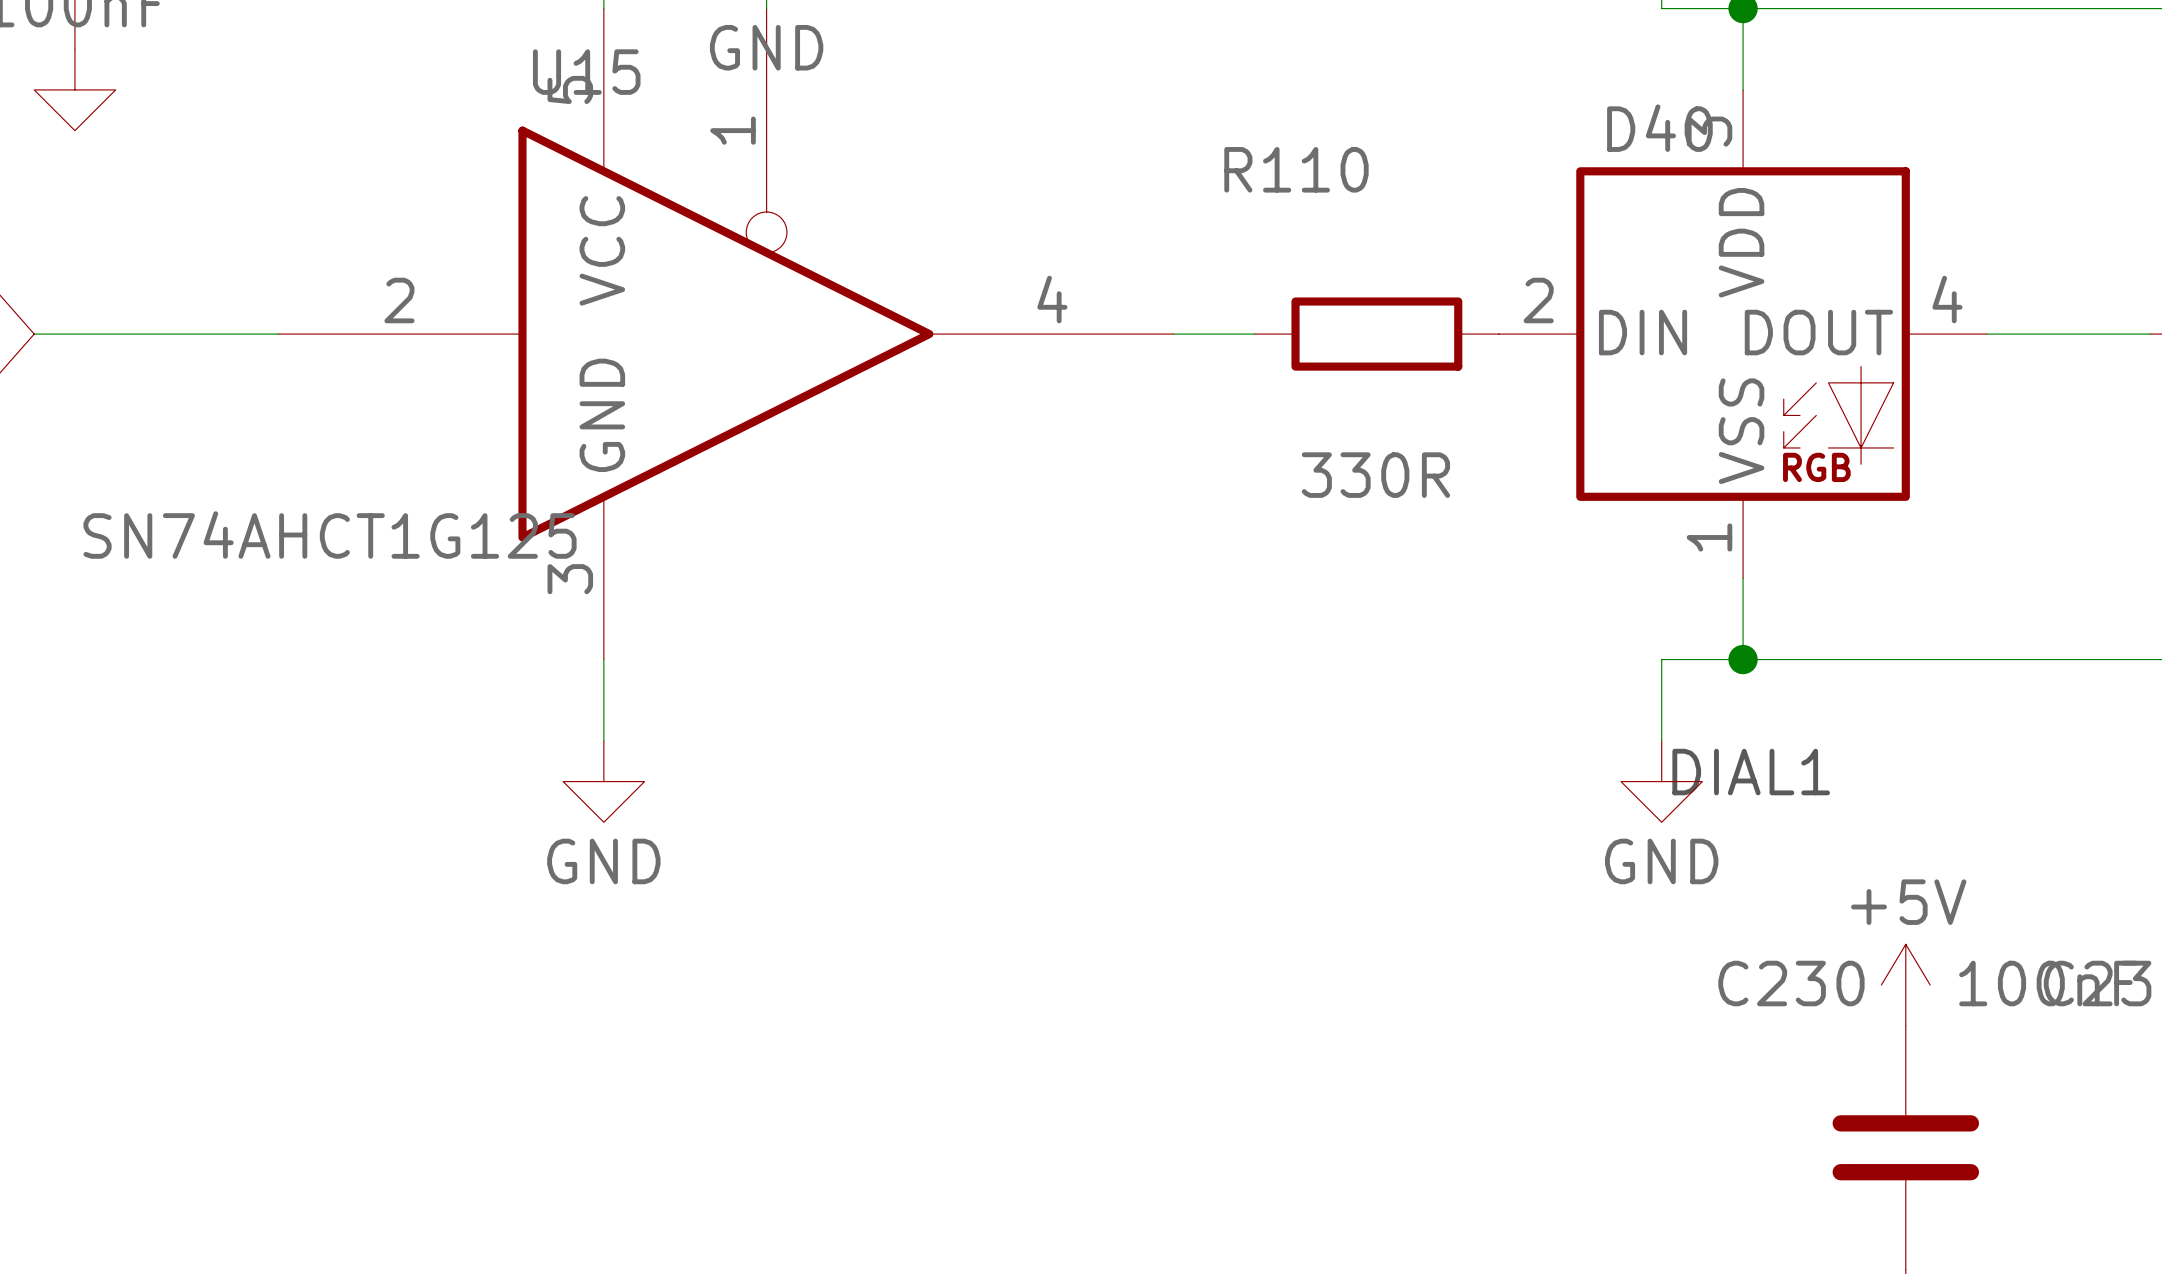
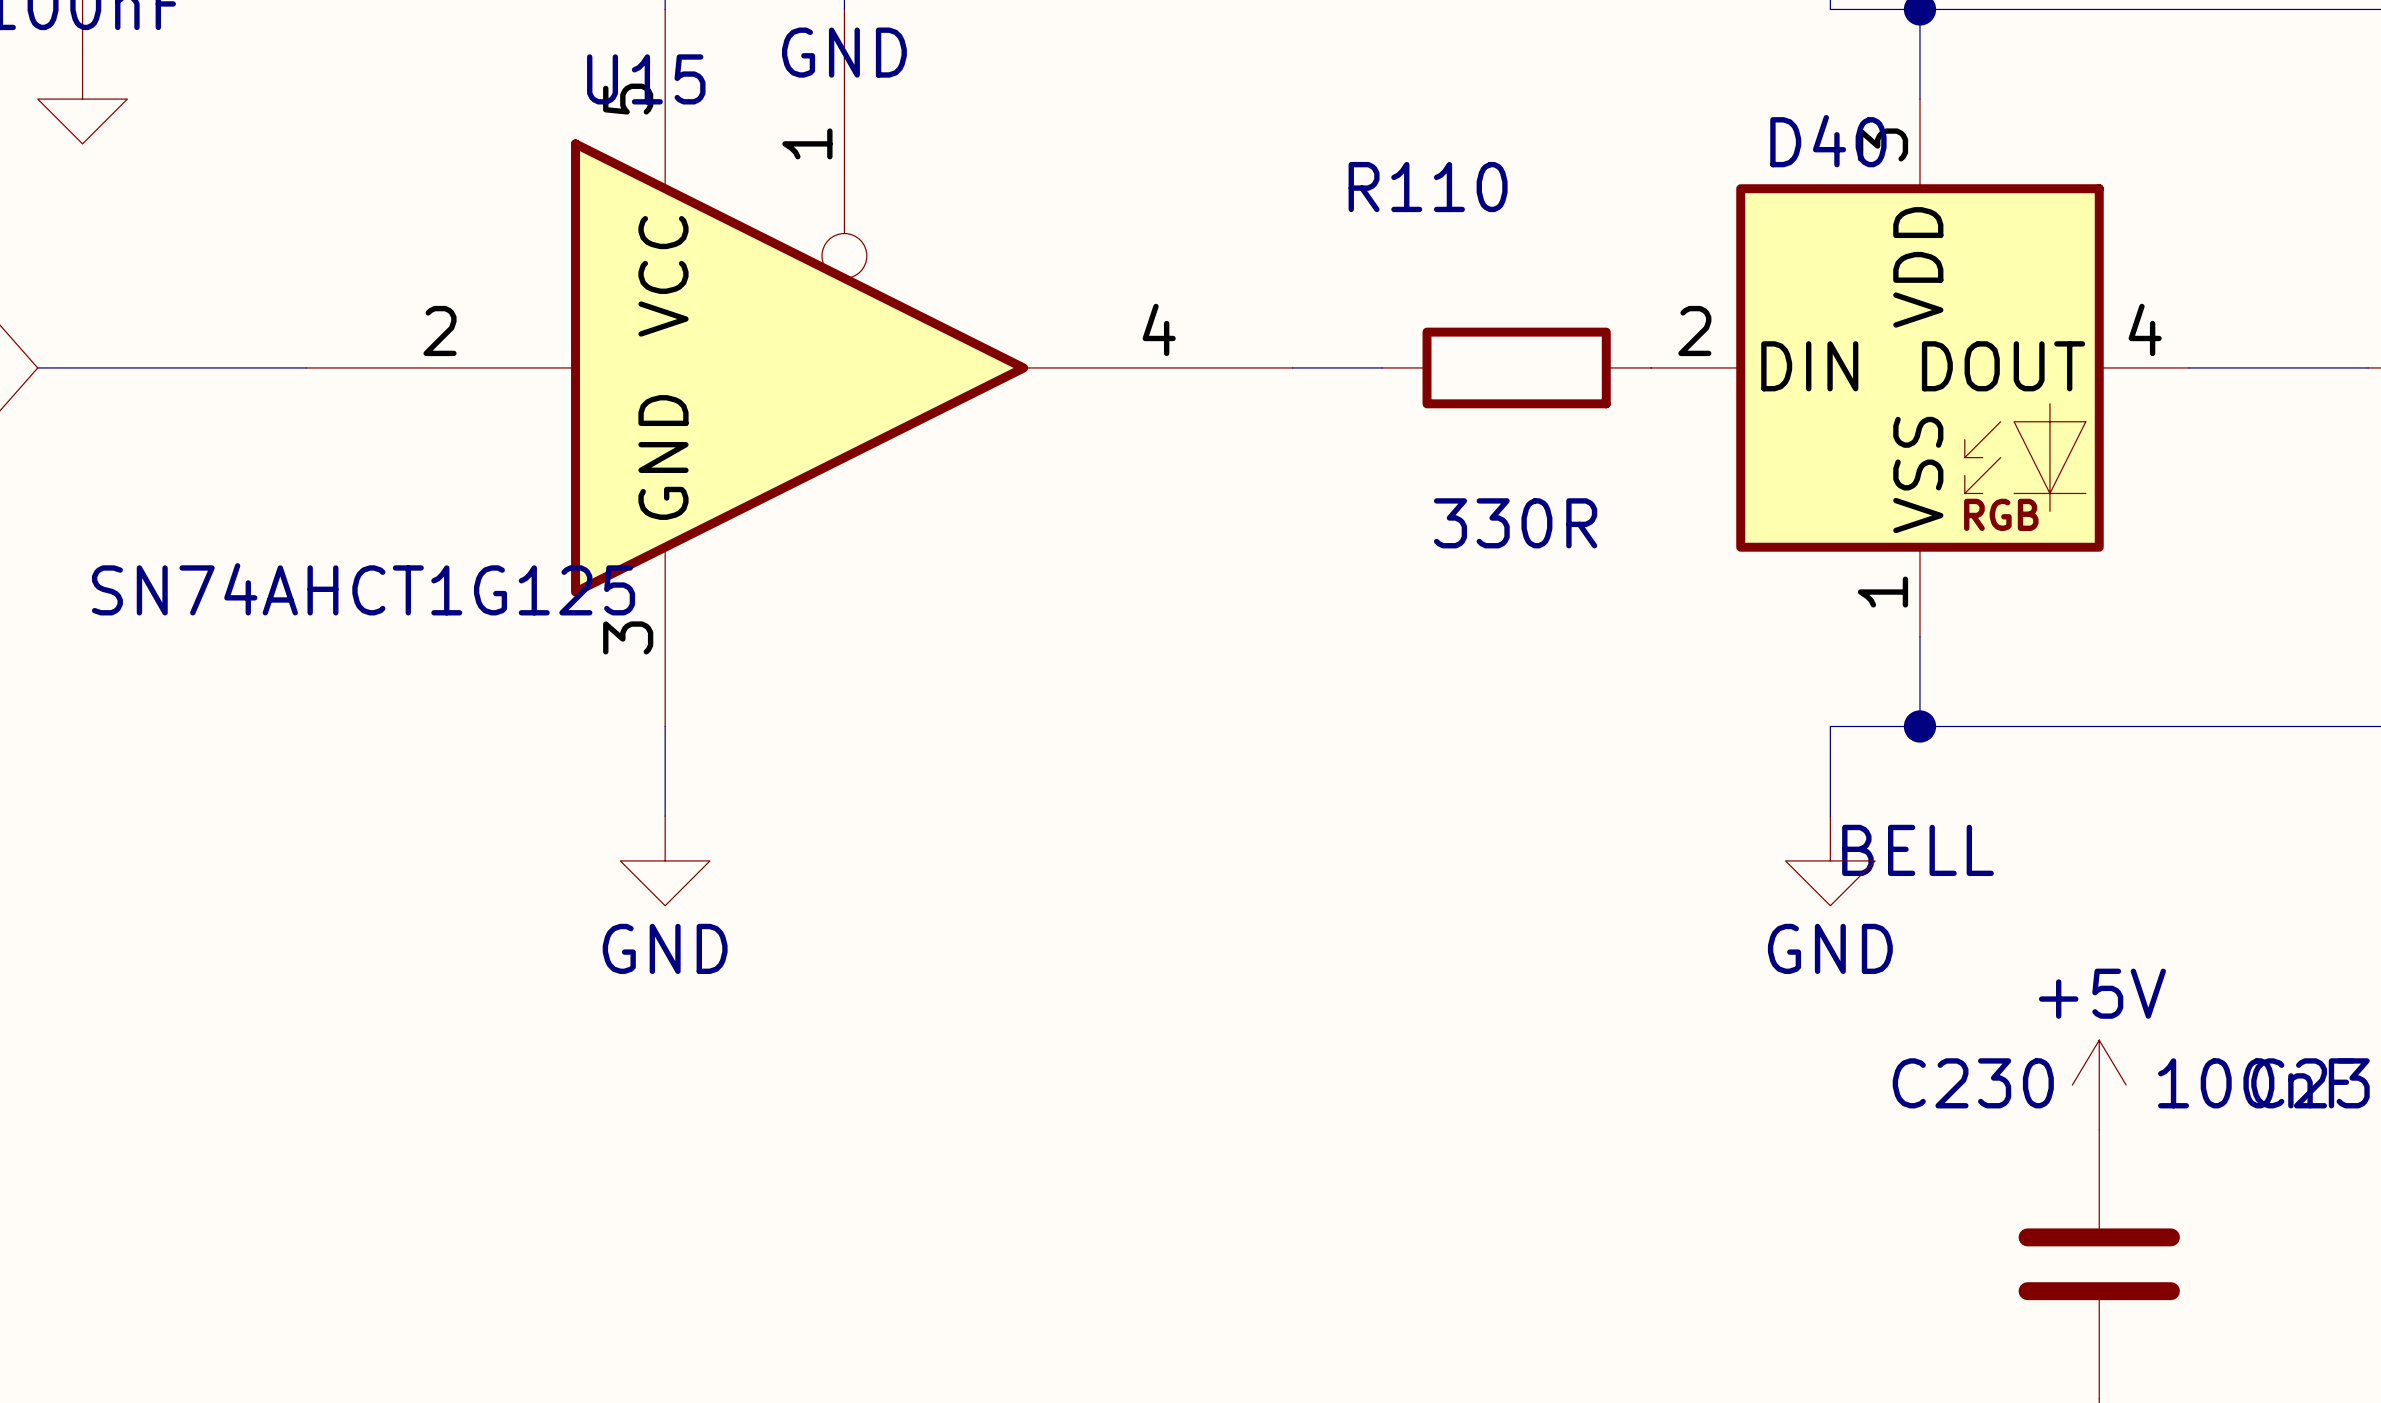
text: DIAL1 (1751, 772) -> BELL (1918, 850)

